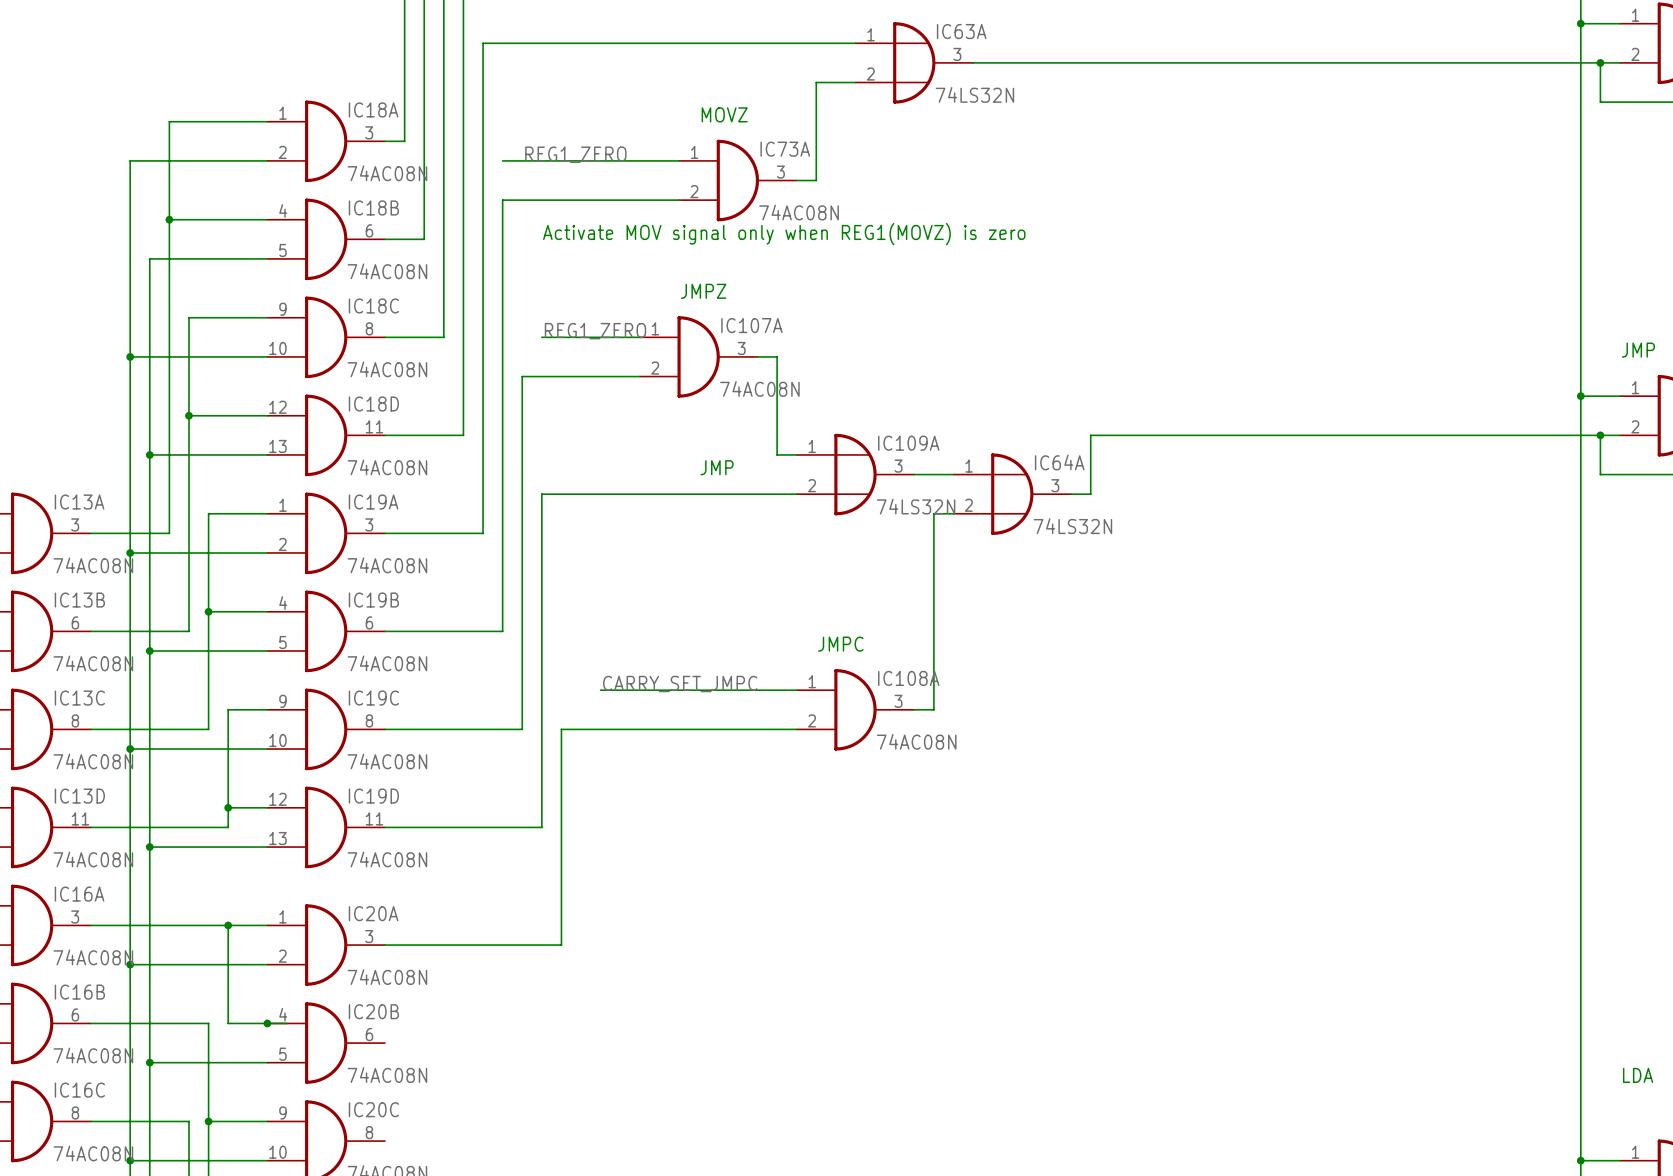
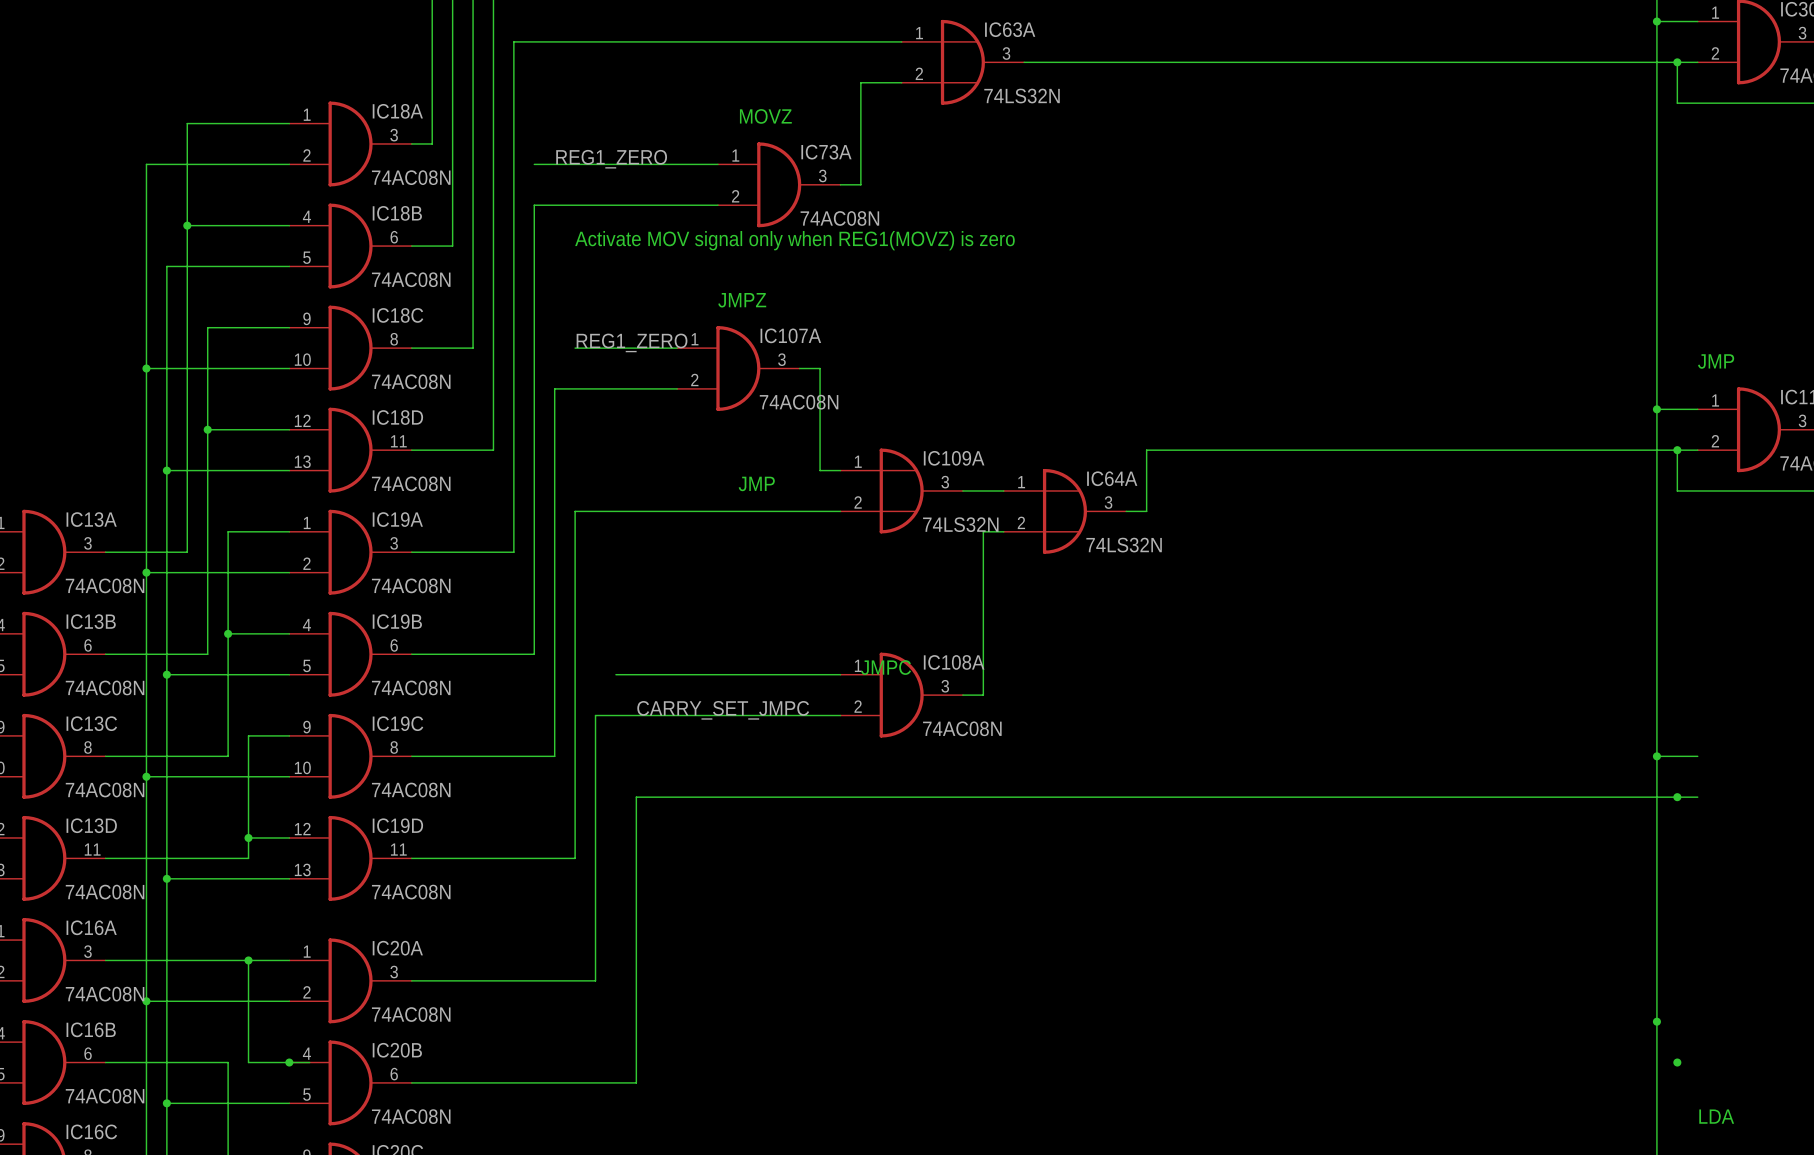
wire: none -> (615, 674) (840, 674)
wire: (933, 670) (933, 709) (914, 709) -> (983, 695) (962, 695)
IC108A position: (855, 709) -> (901, 695)
wire: (561, 729) (796, 729) -> (595, 756) (595, 715) (636, 715)
wire: none -> (1656, 756) (1697, 756)
junction: none -> (1656, 756)
junction: none -> (1677, 797)
wire: none -> (1697, 797) (636, 797) (636, 1082) (411, 1082)
junction: none -> (1656, 1021)
junction: none -> (1677, 1062)

